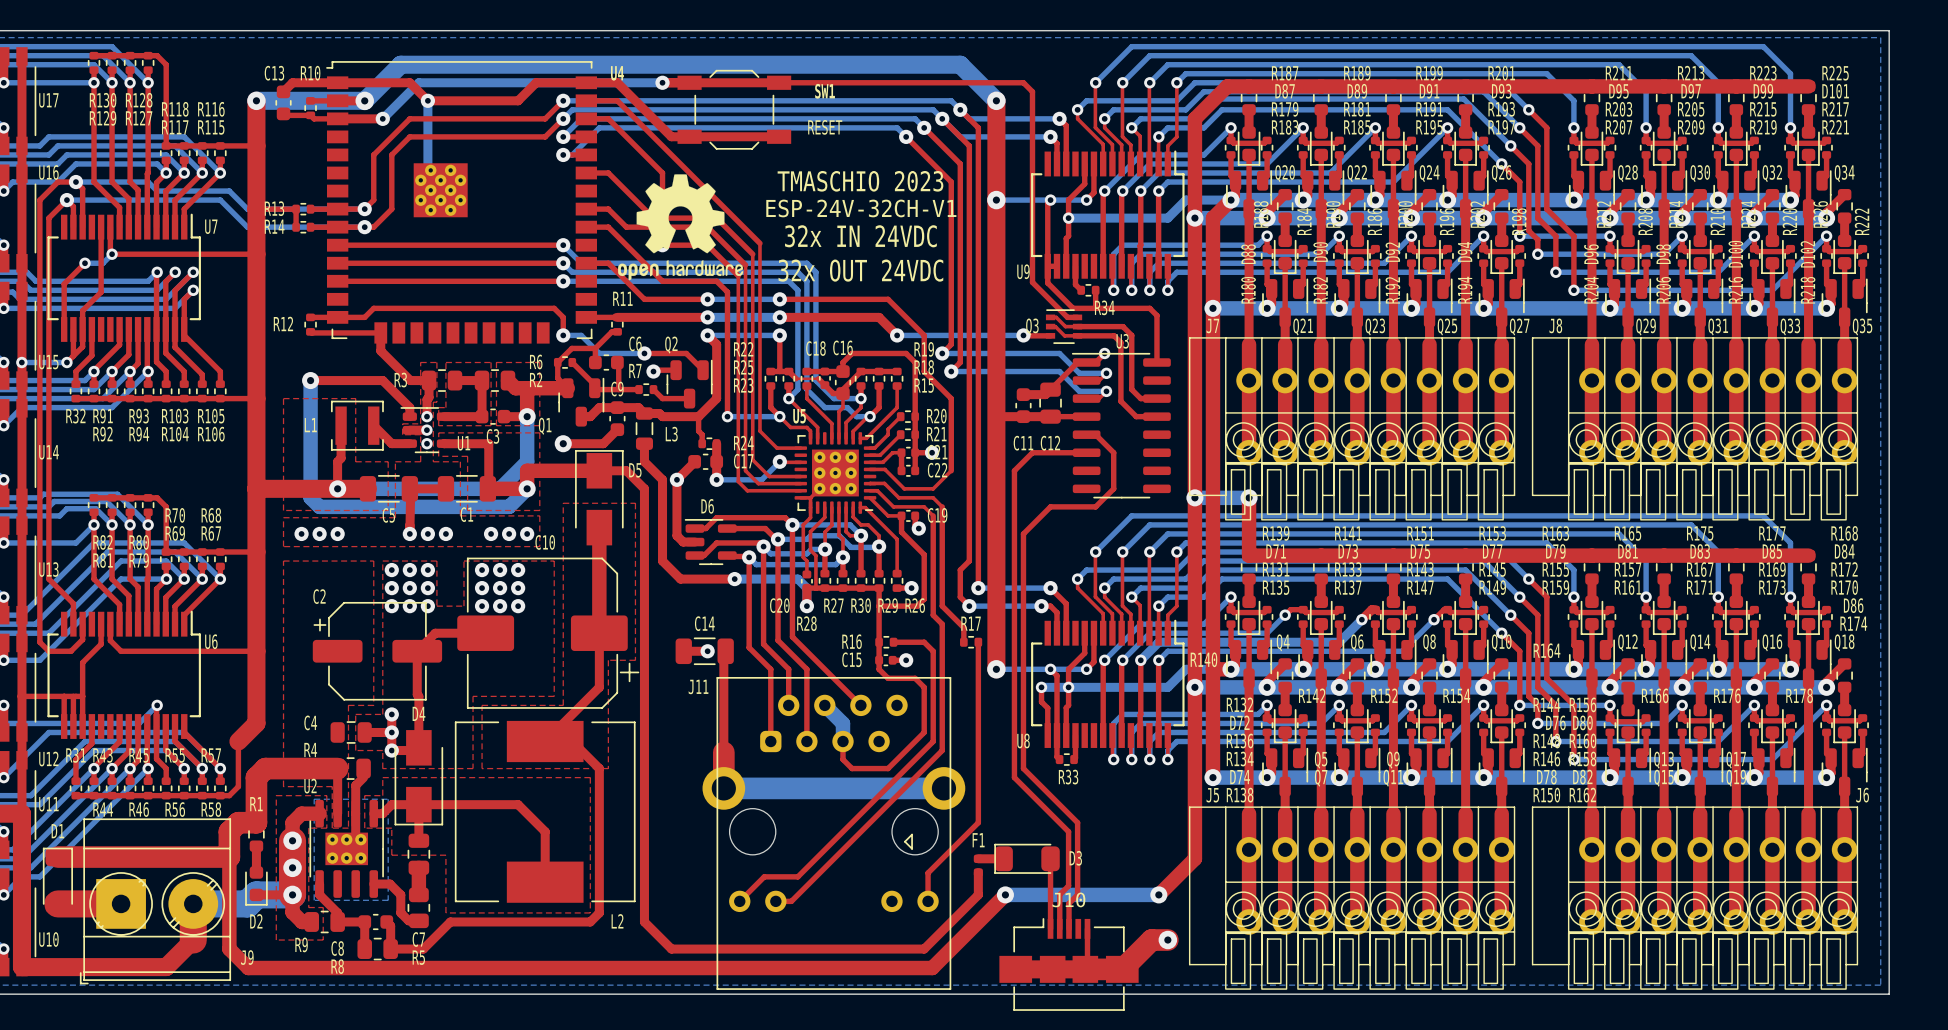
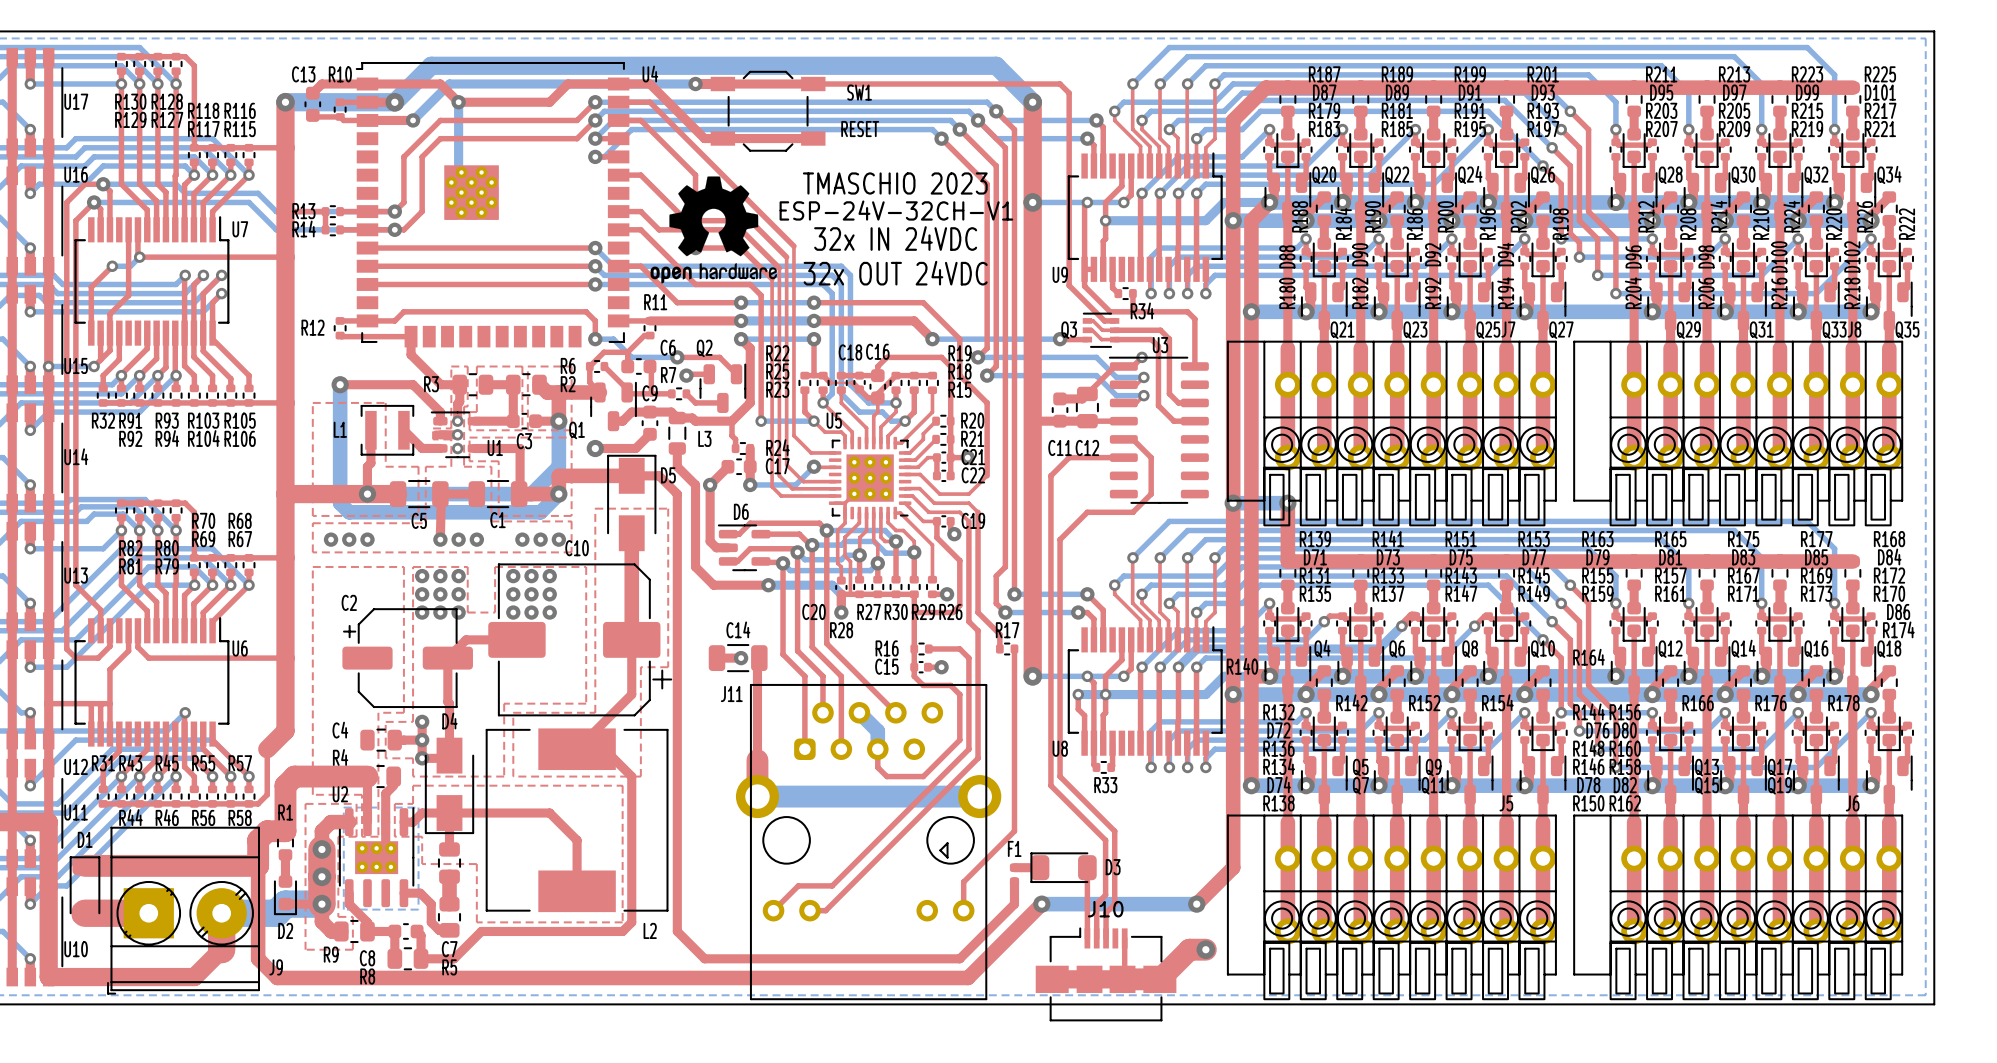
J8 name position: J8 (1555, 325) -> J8 (1854, 329)
J7 name position: J7 (1212, 326) -> J7 (1508, 329)
J5 name position: J5 (1212, 795) -> J5 (1506, 803)
J6 name position: J6 (1862, 795) -> J6 (1852, 803)

